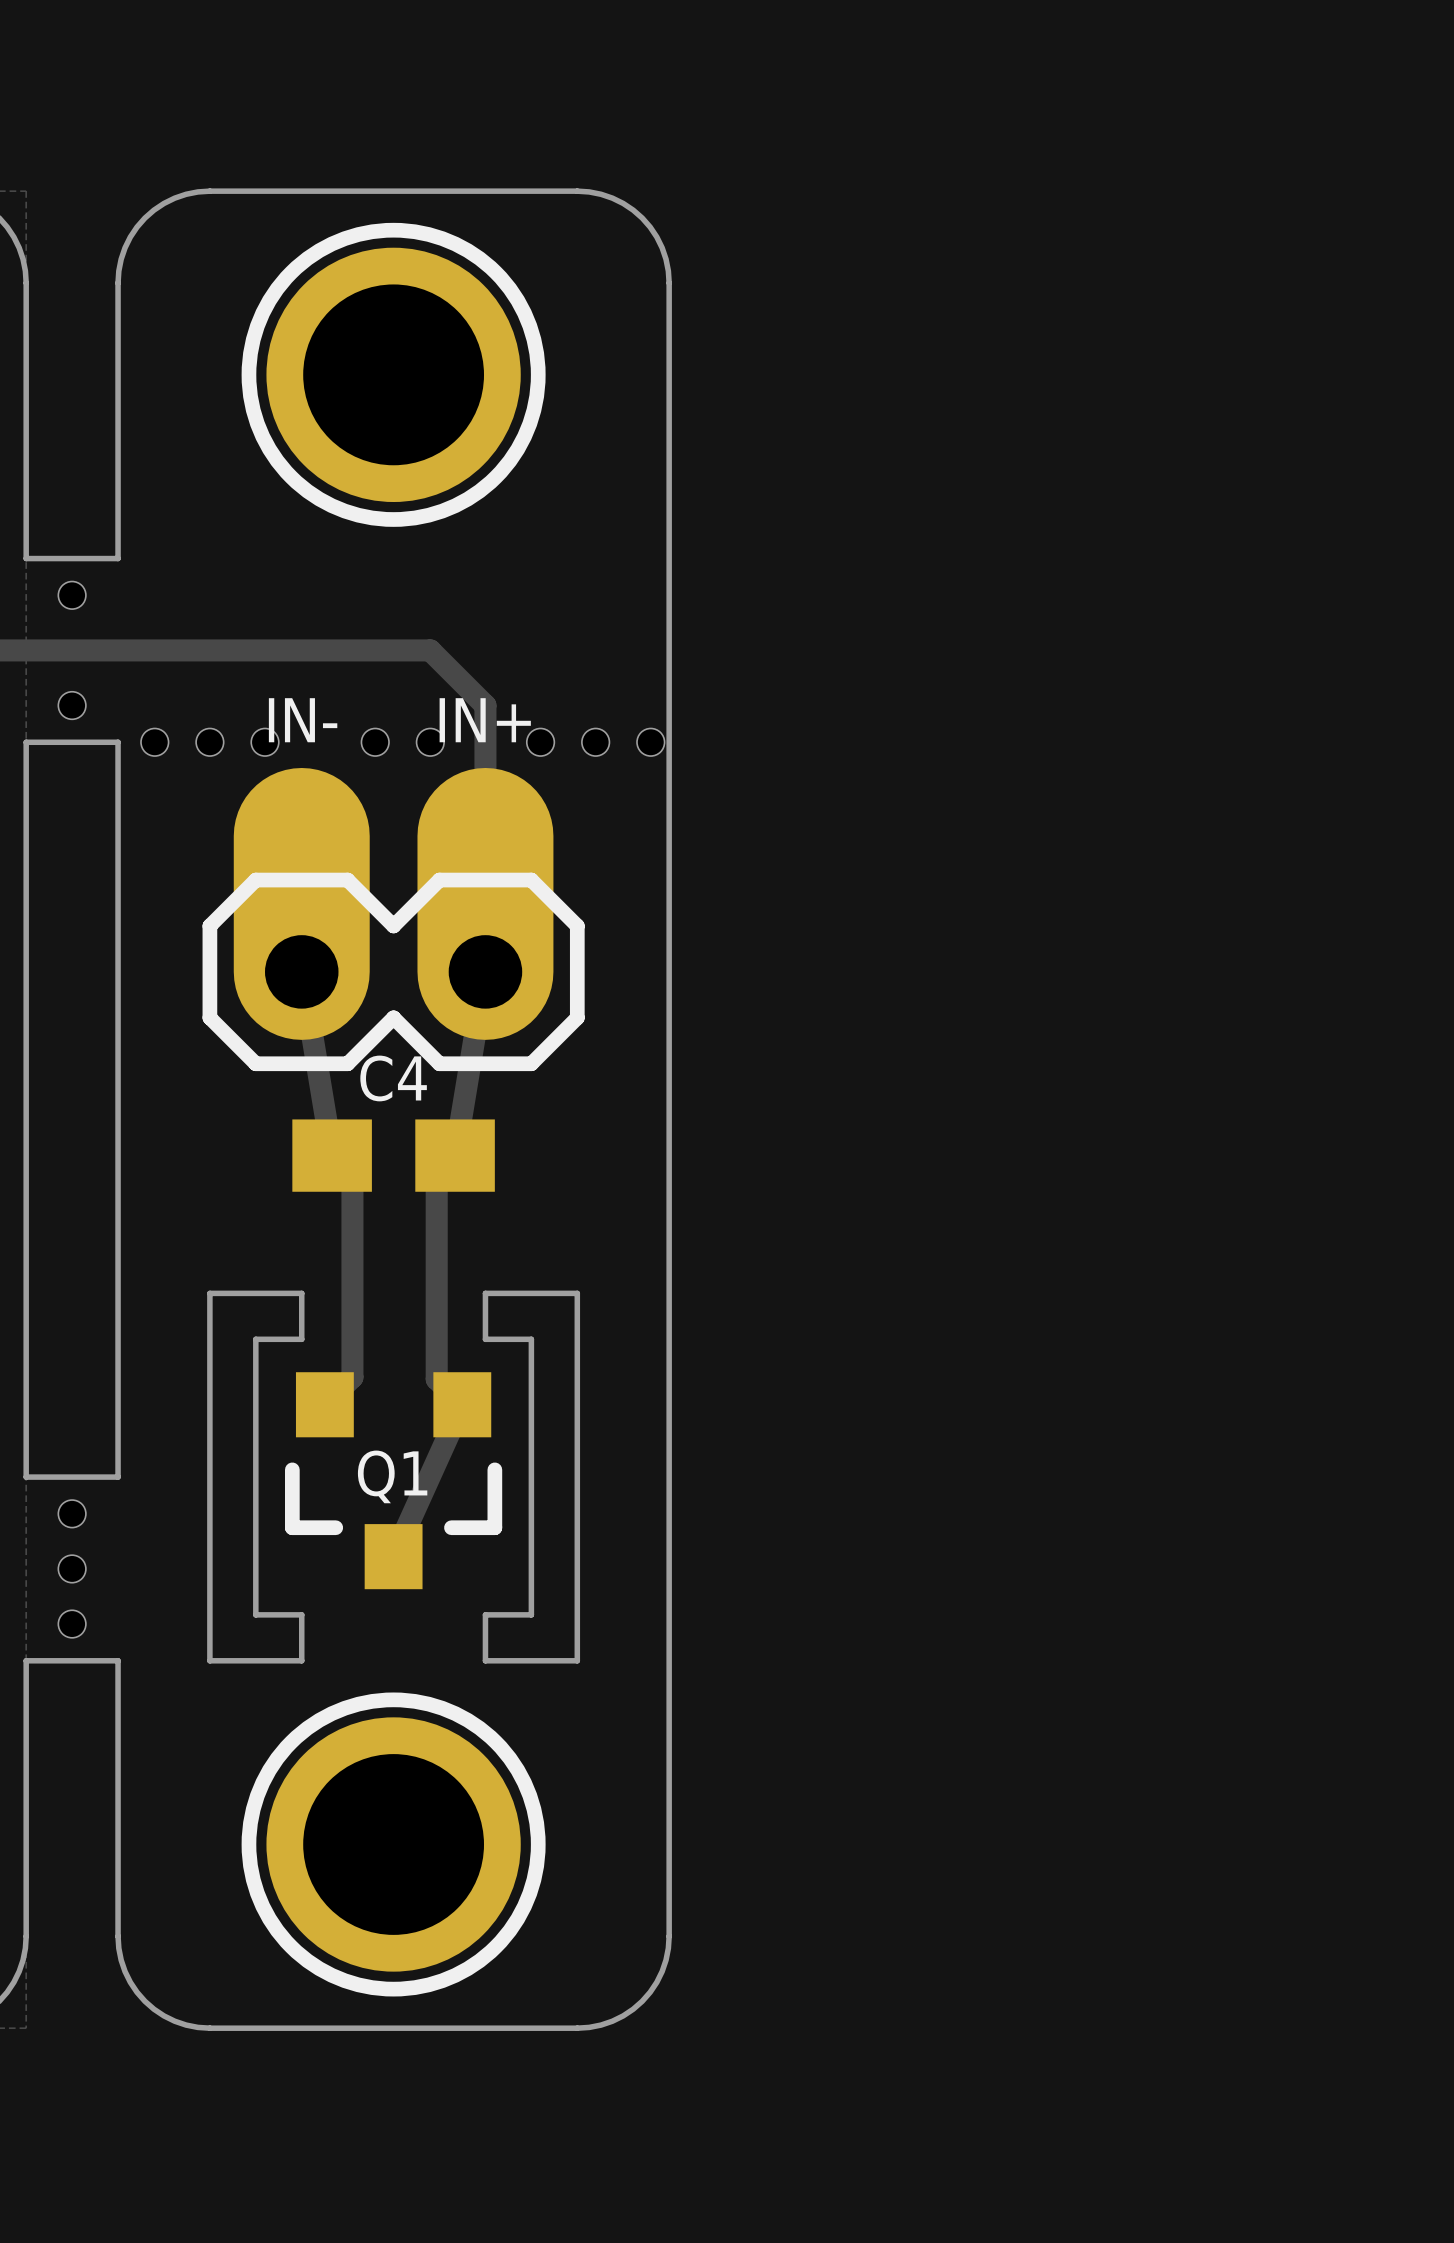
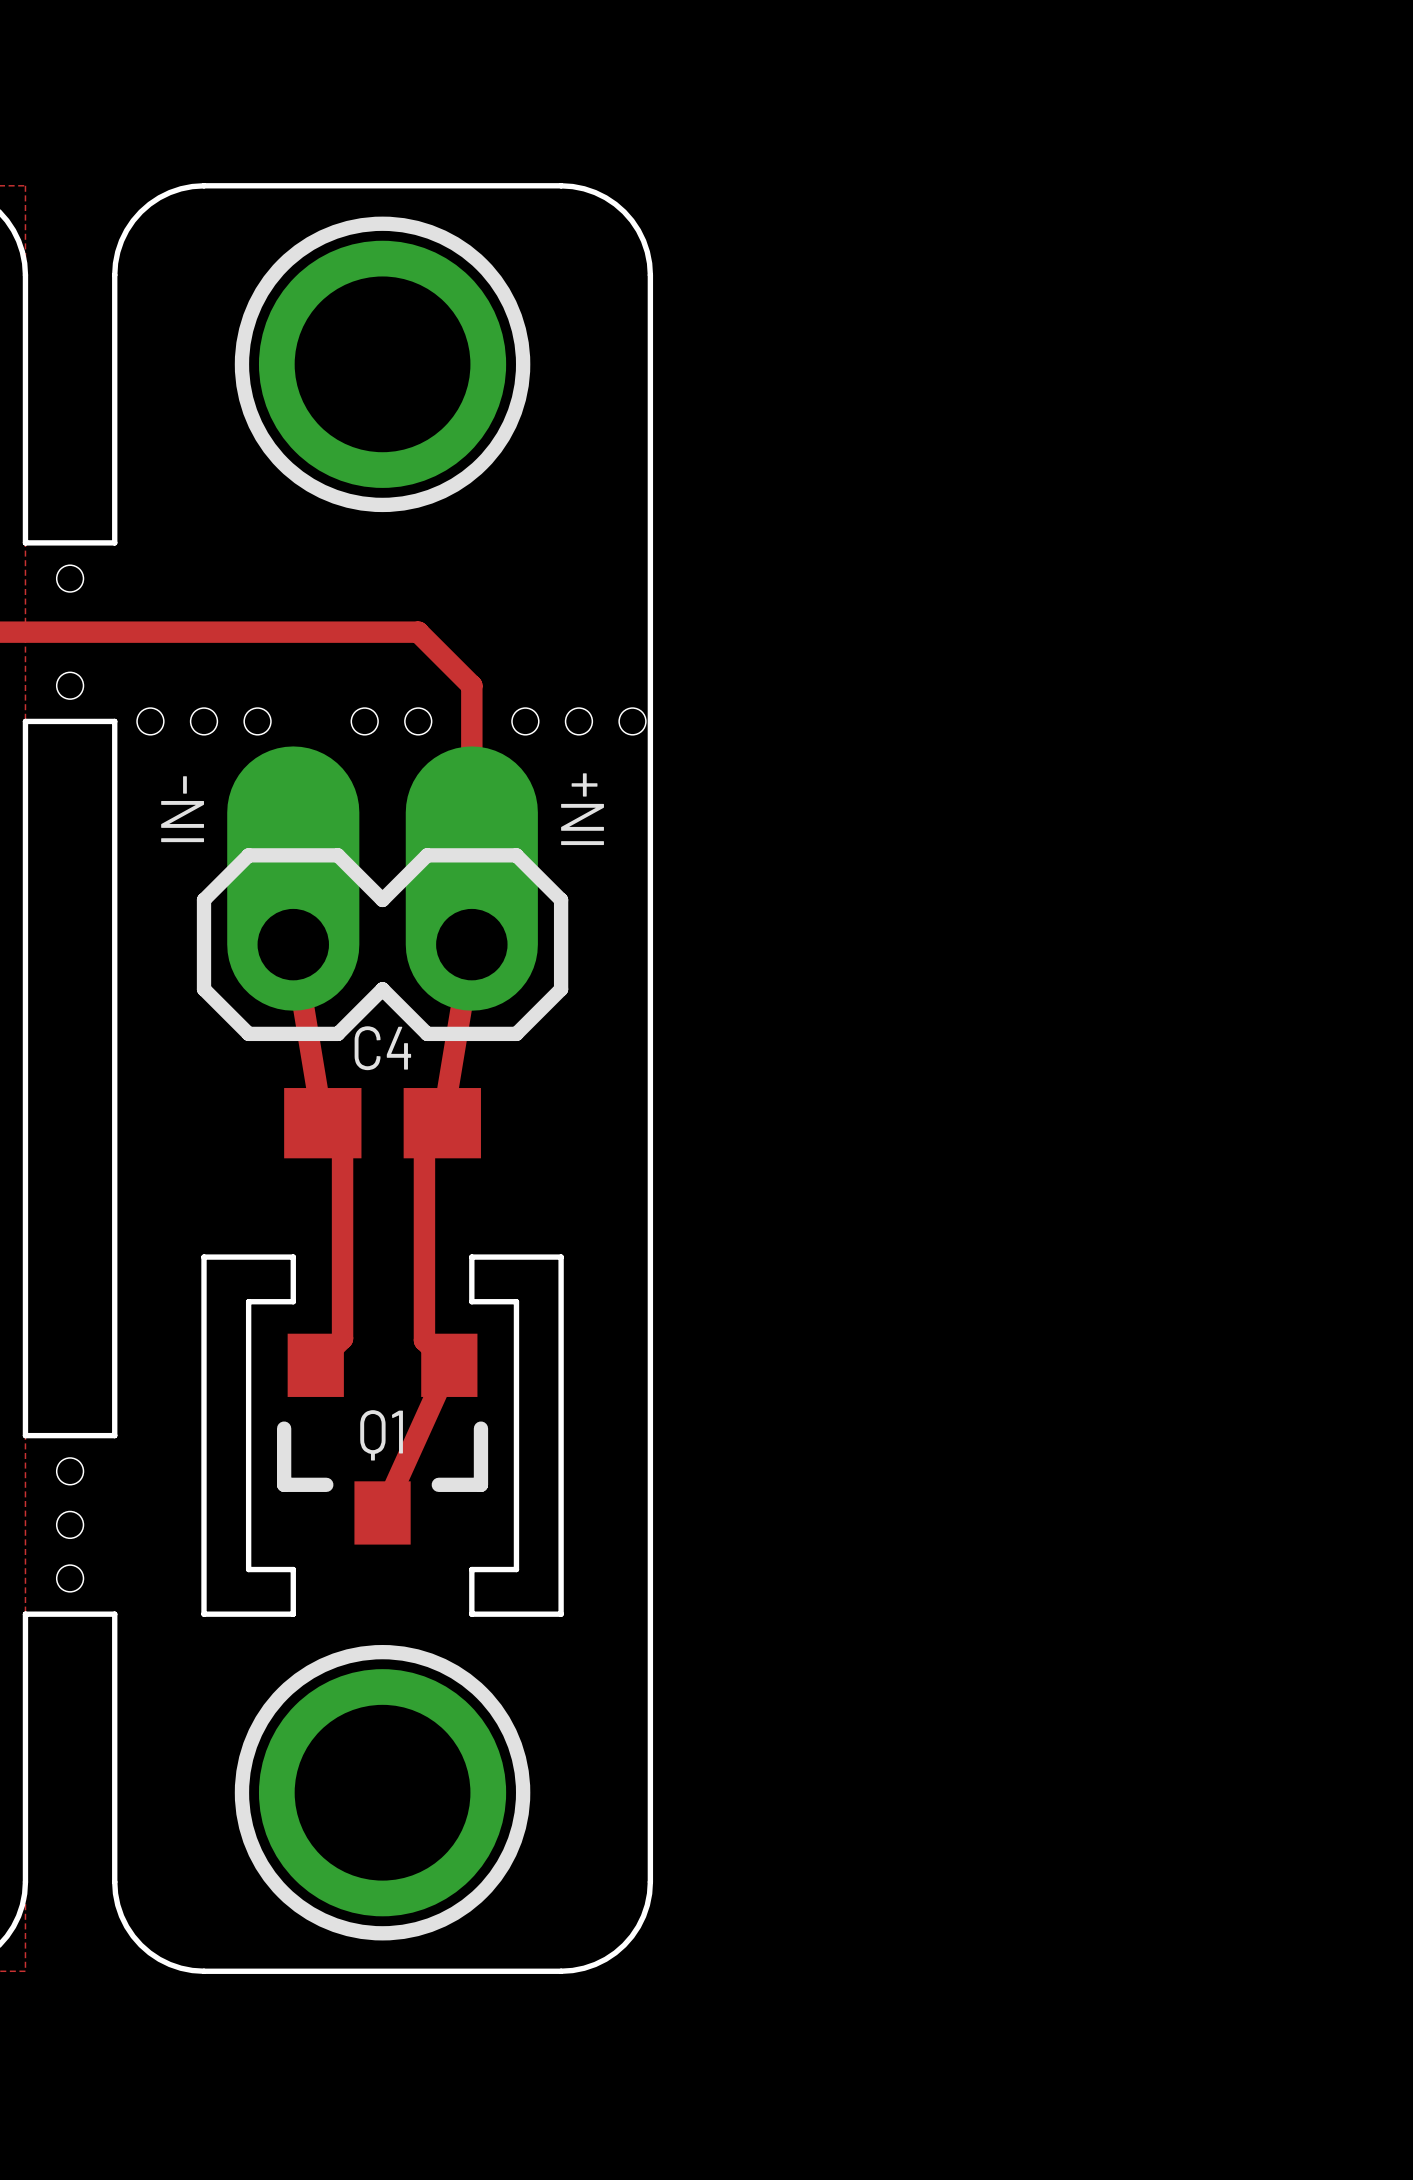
text rotation: 0° (303, 720) -> 90° counterclockwise (182, 809)
text position: IN- (303, 720) -> IN- (182, 809)
text rotation: 0° (485, 720) -> 90° counterclockwise (582, 809)
text position: IN+ (485, 720) -> IN+ (582, 809)

